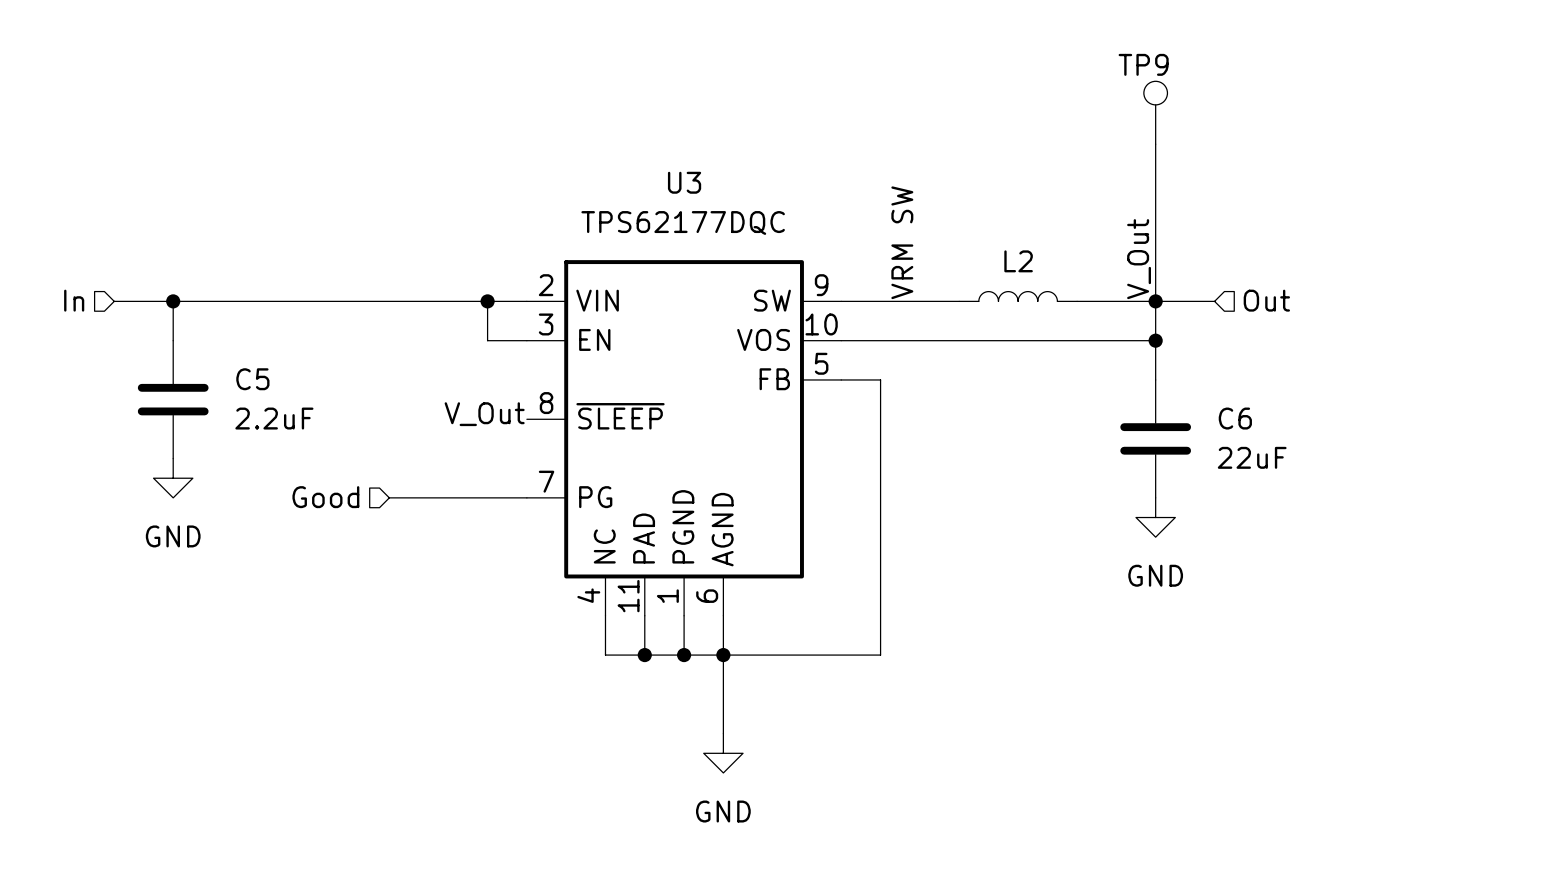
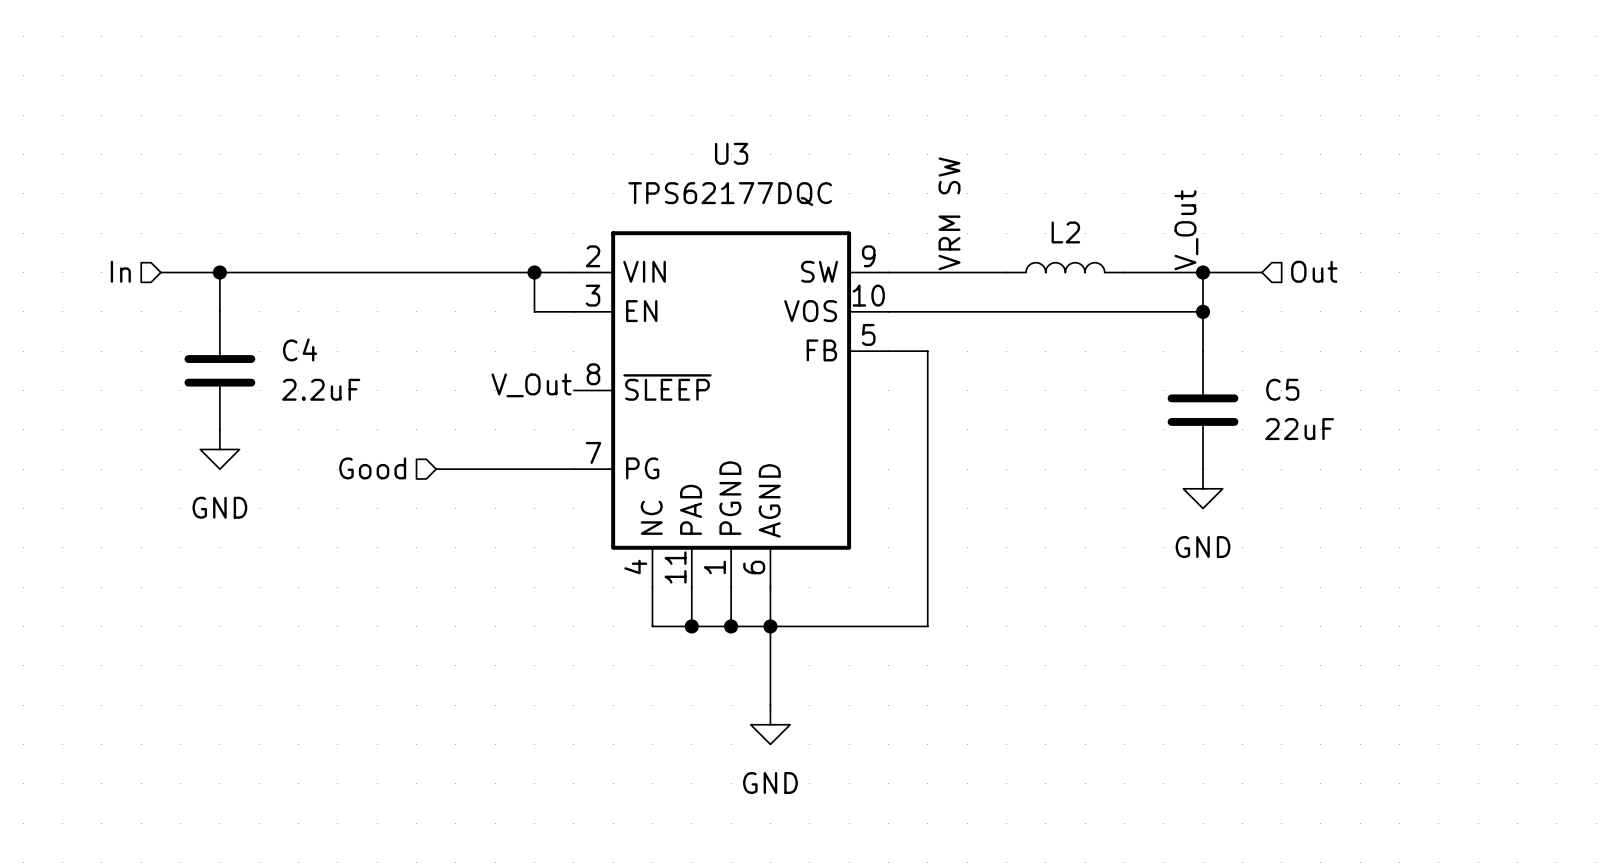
TP9: (1155, 112) -> none
wire: (1155, 144) (1155, 301) -> none
C5 name: C5 (252, 379) -> C4 (300, 349)
C6 name: C6 (1235, 418) -> C5 (1282, 389)

